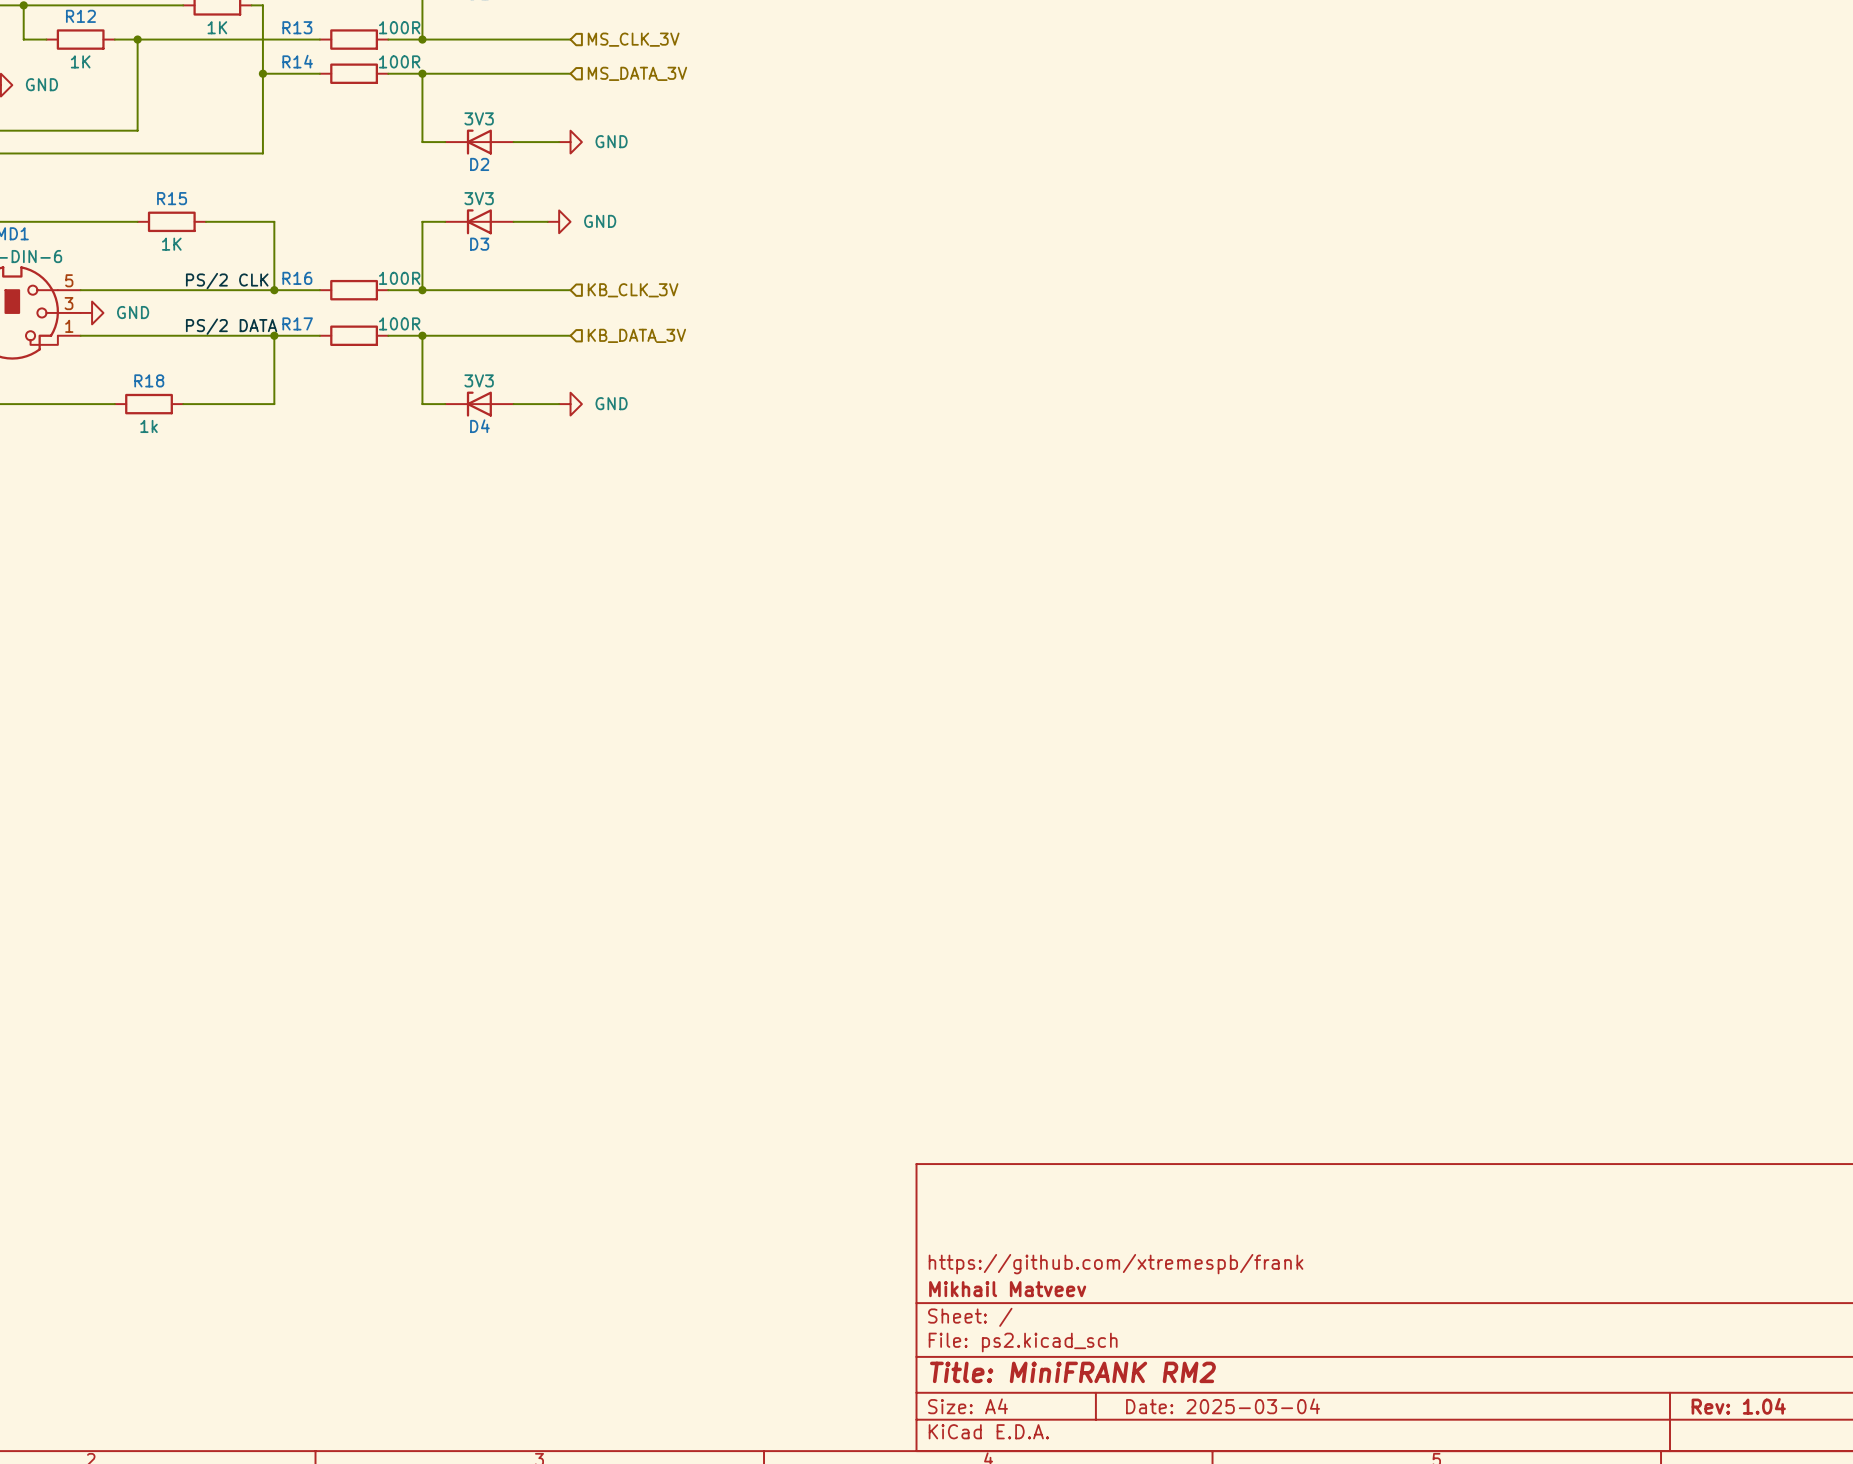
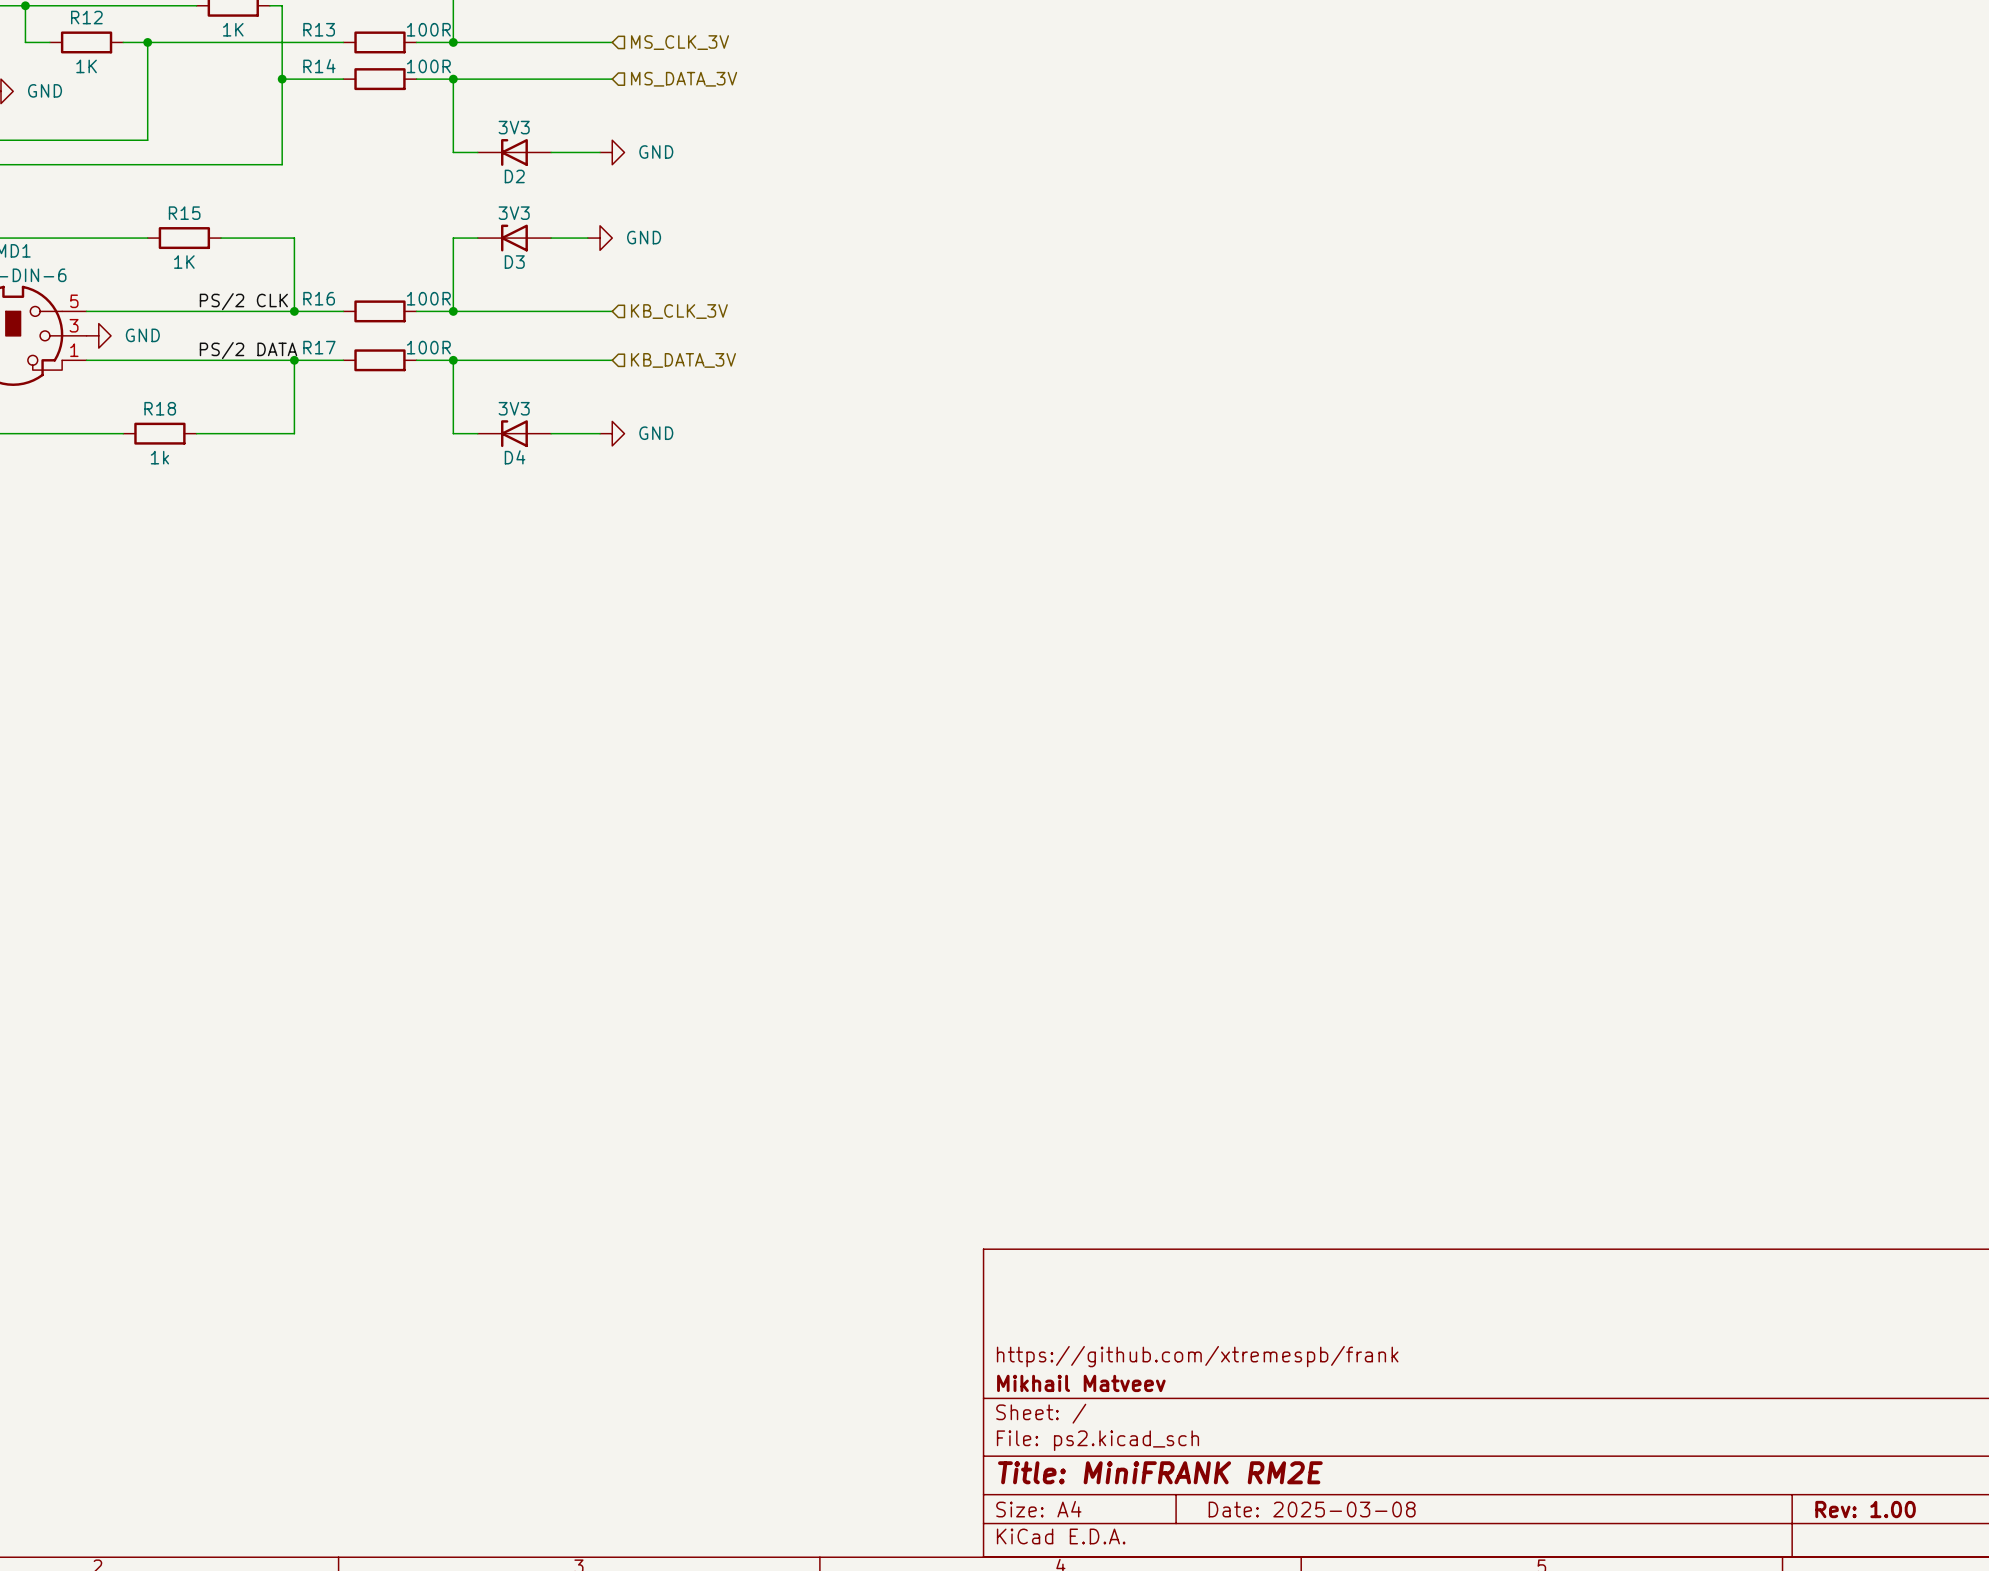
title block: Title: MiniFRANK RM2 (1072, 1372) -> Title: MiniFRANK RM2E (1160, 1472)
title block: Date: 2025-03-04 (1223, 1406) -> Date: 2025-03-08 (1312, 1509)
title block: Rev: 1.04 (1738, 1406) -> Rev: 1.00 (1865, 1509)

